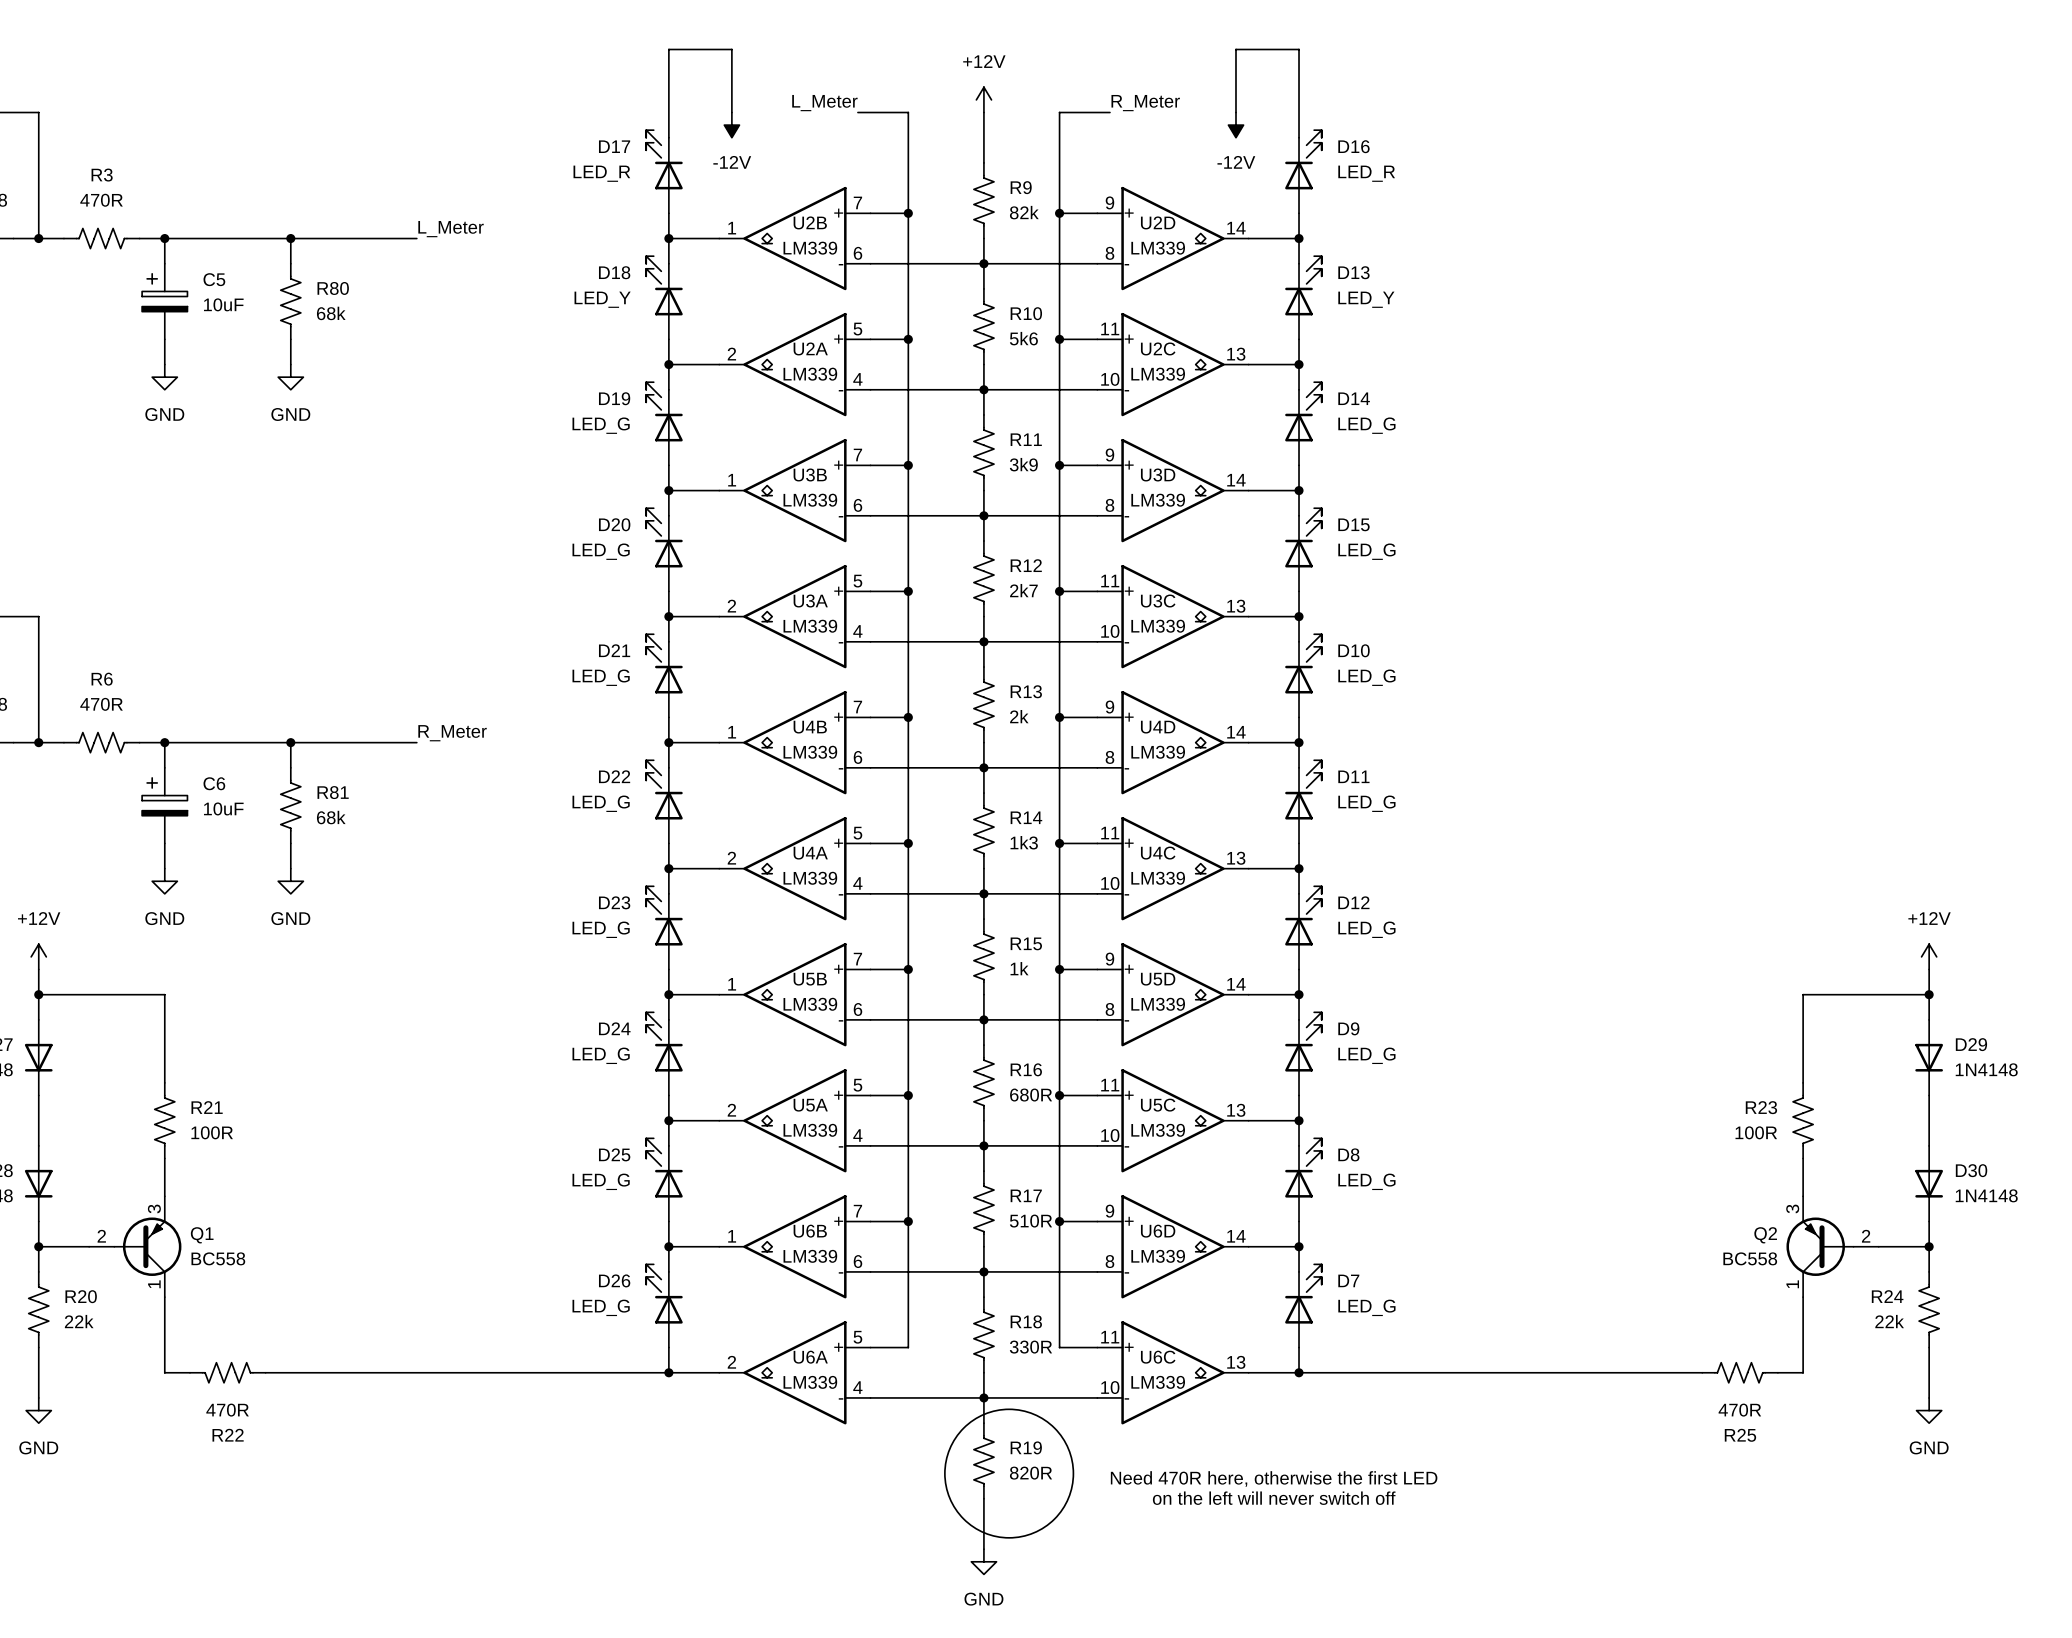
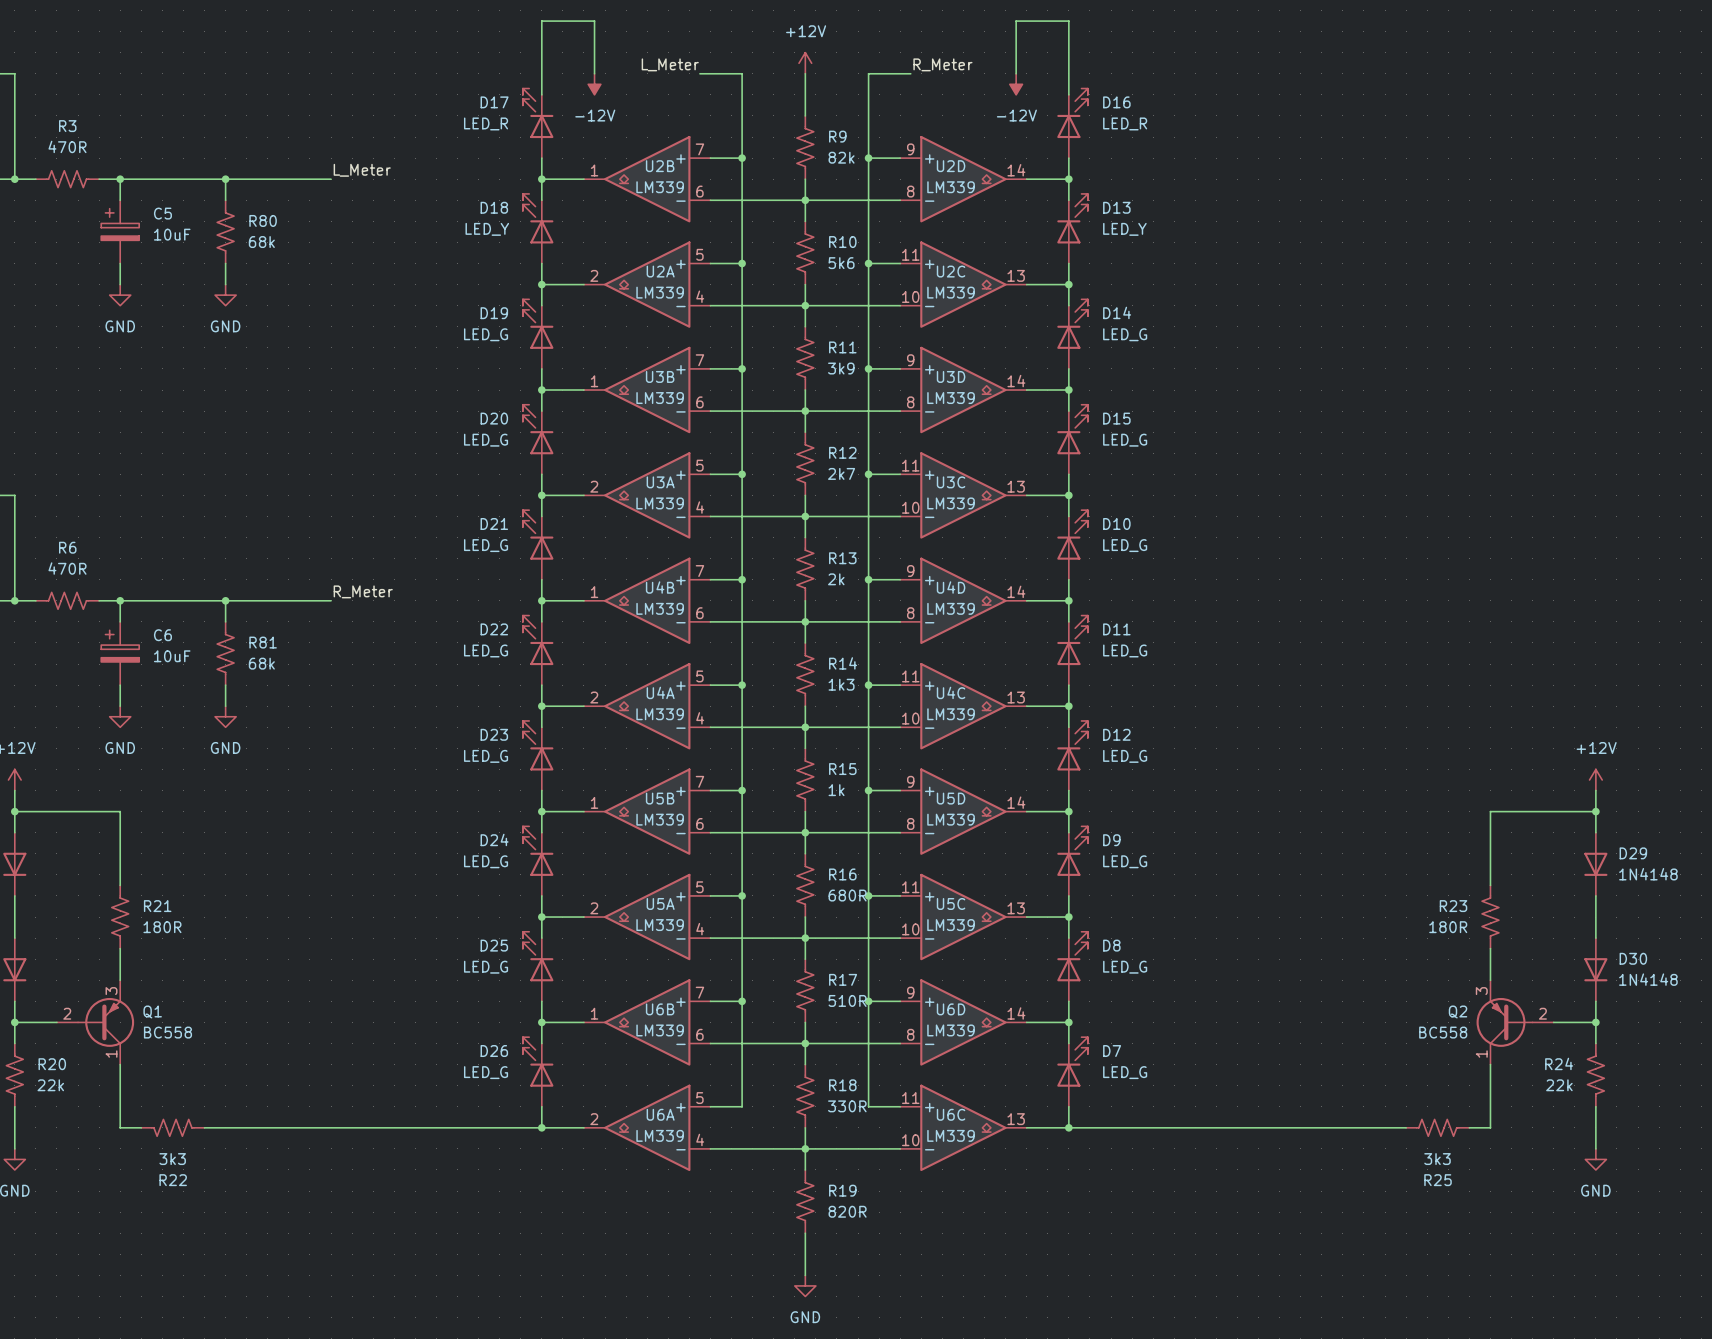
R21 value: 100R (212, 1132) -> 180R (162, 927)
R23 value: 100R (1756, 1132) -> 180R (1448, 927)
drawing: [944, 1409, 1074, 1538] -> none
R22 value: 470R (227, 1410) -> 3k3 (172, 1159)
R25 value: 470R (1739, 1410) -> 3k3 (1437, 1159)
text: Need 470R here, otherwise the first LED (1274, 1478) -> none
text: on the left will never switch off (1274, 1498) -> none

